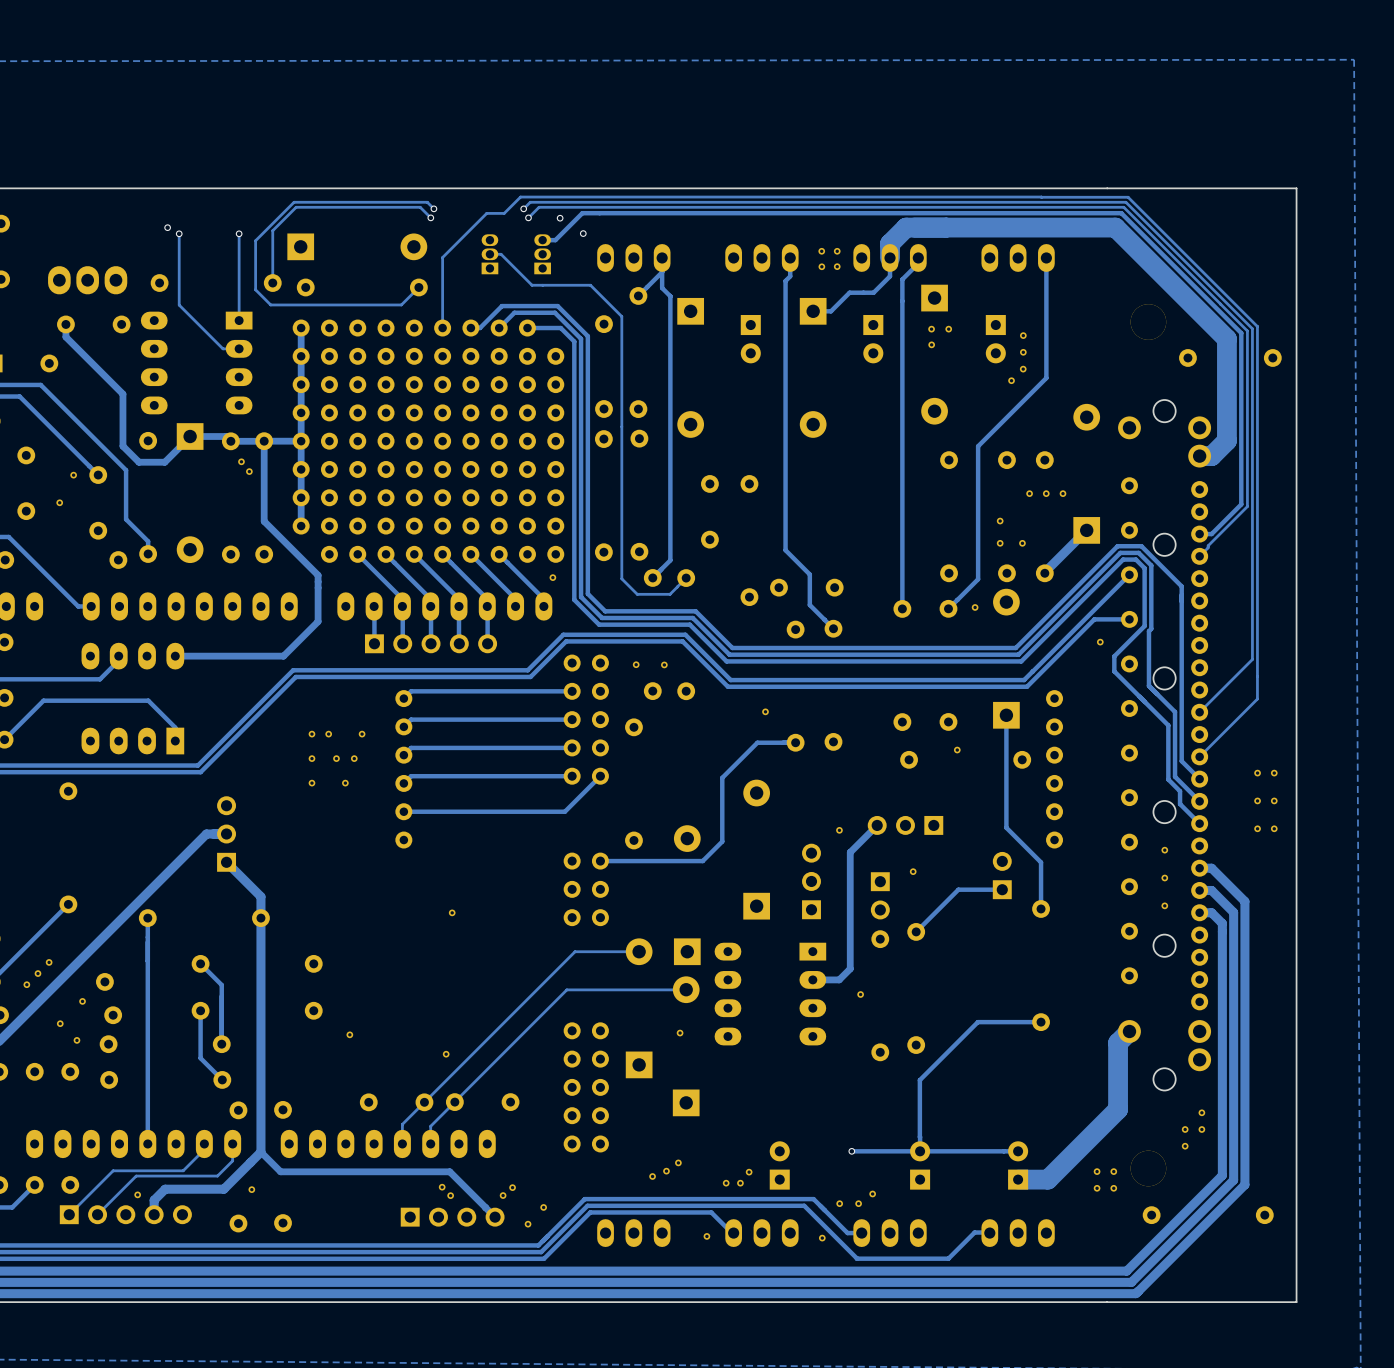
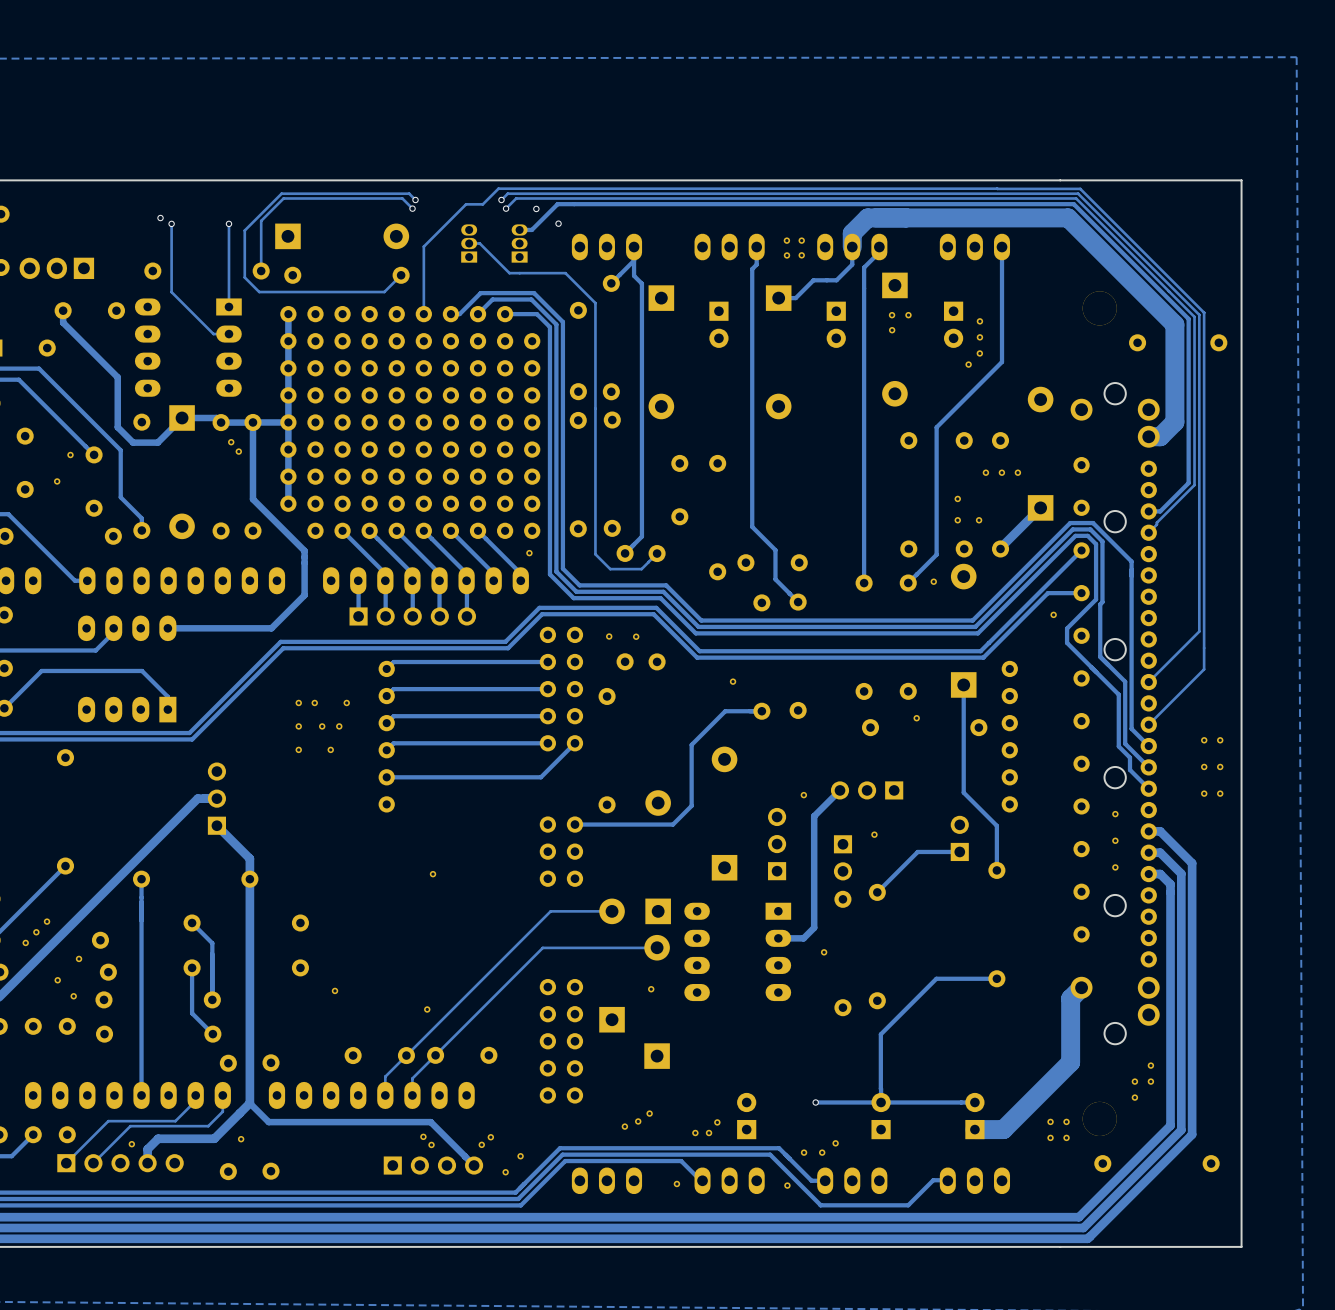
part: none -> (56, 268)
part: (87, 280) -> none

